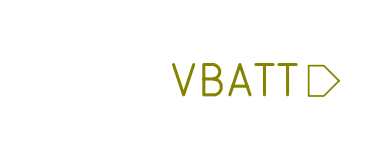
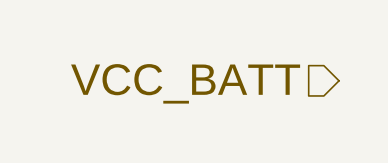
hierarchical label: VBATT (234, 79) -> VCC_BATT (185, 83)

